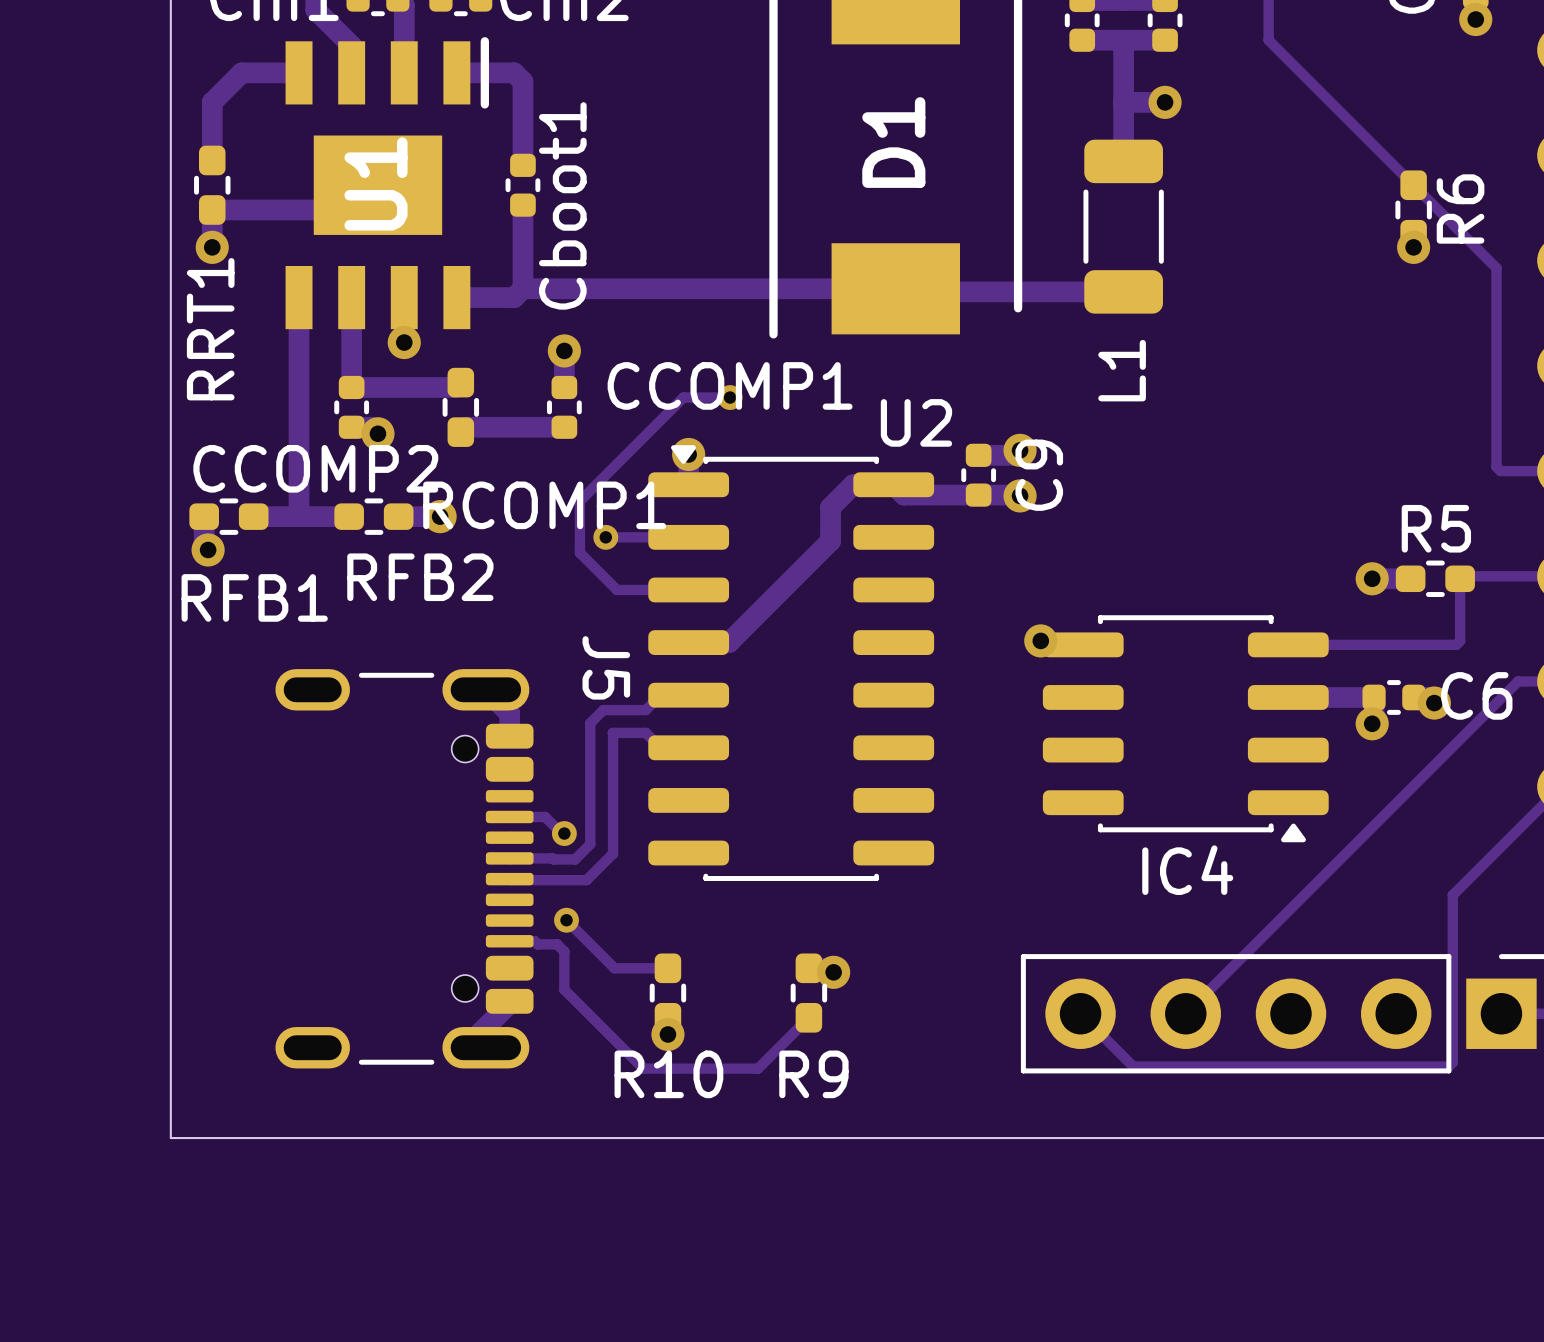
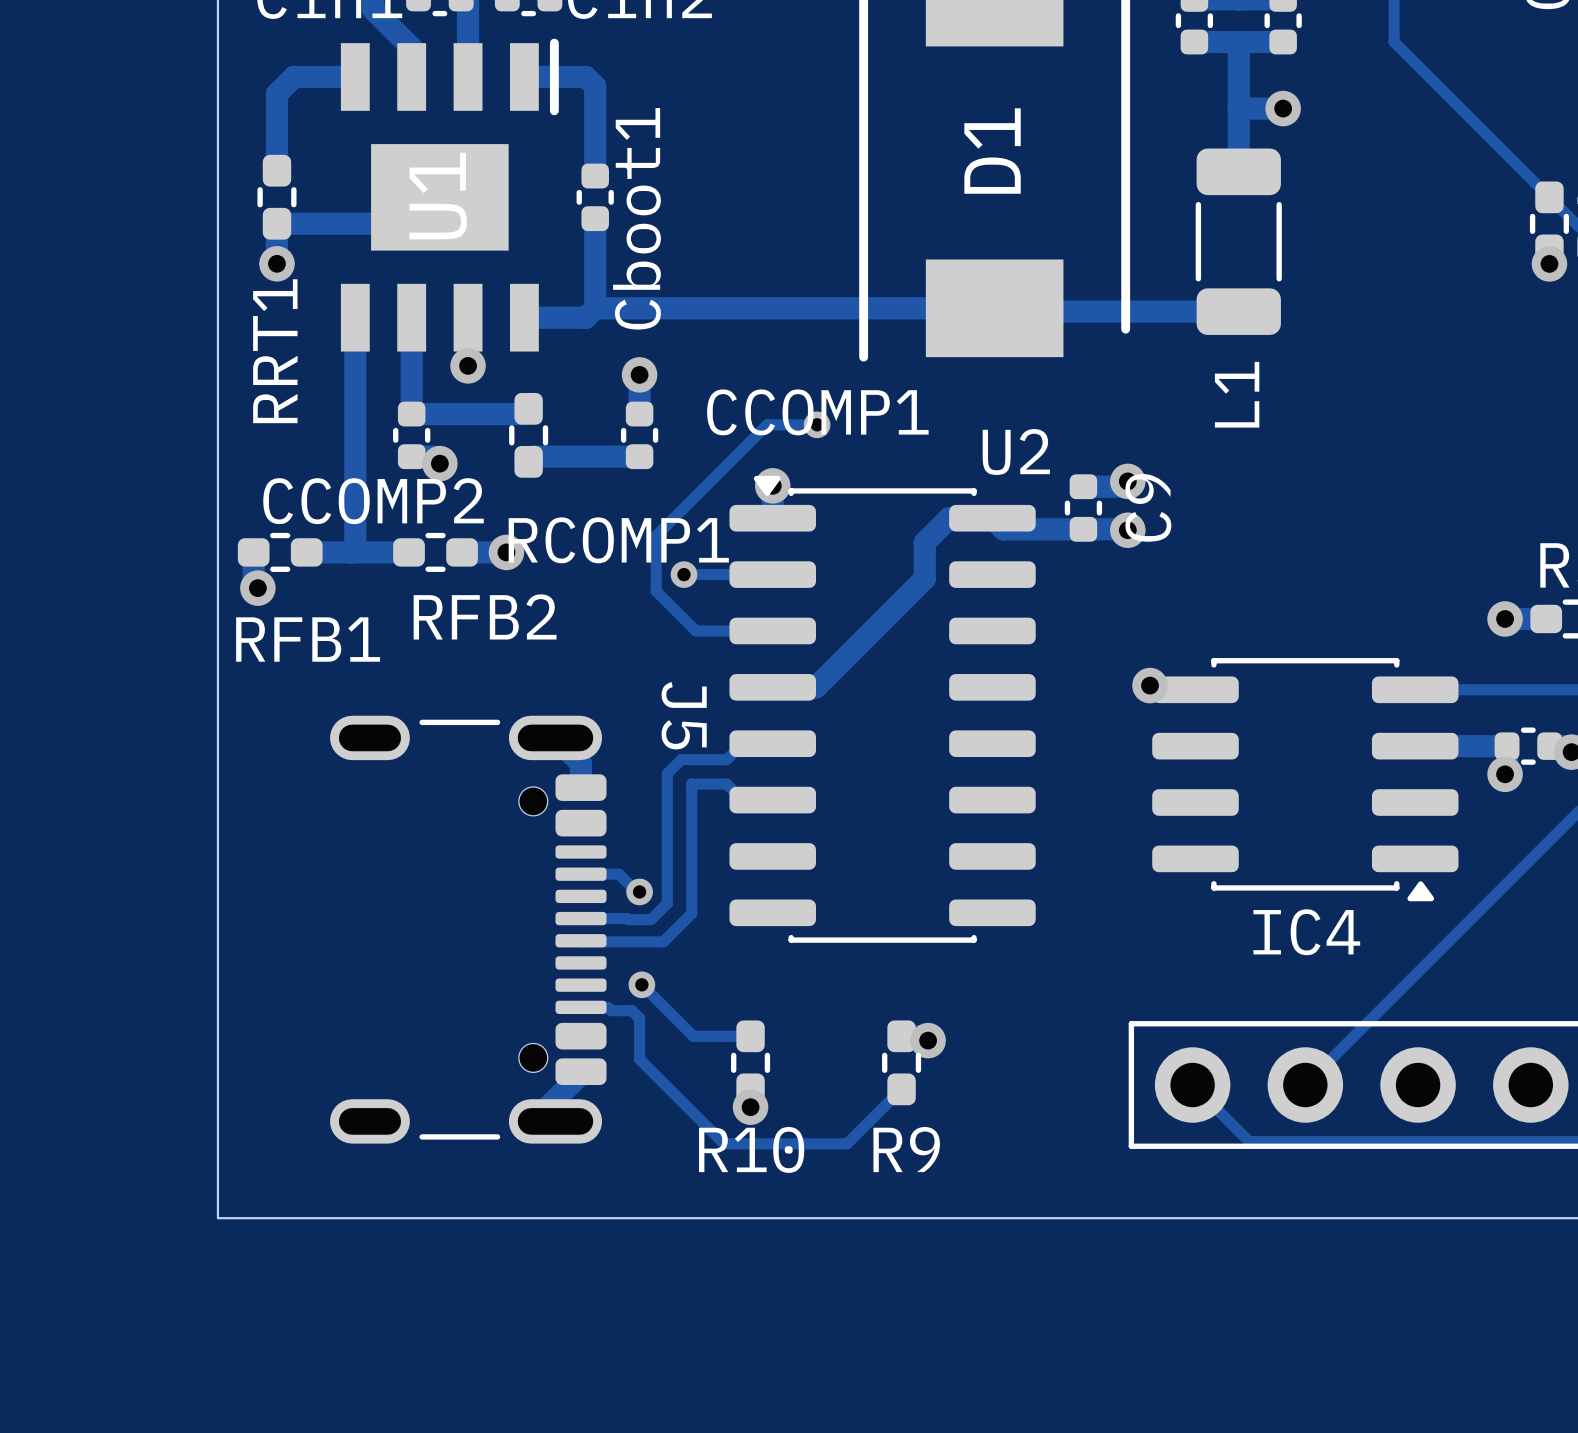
track: (225, 88) (212, 102) (212, 160) -> (276, 93) (276, 170)
RRT1 position: (212, 185) -> (276, 197)
track: (353, 209) (212, 209) (212, 247) -> (413, 223) (276, 223) (276, 263)
via position: (212, 247) -> (276, 263)

